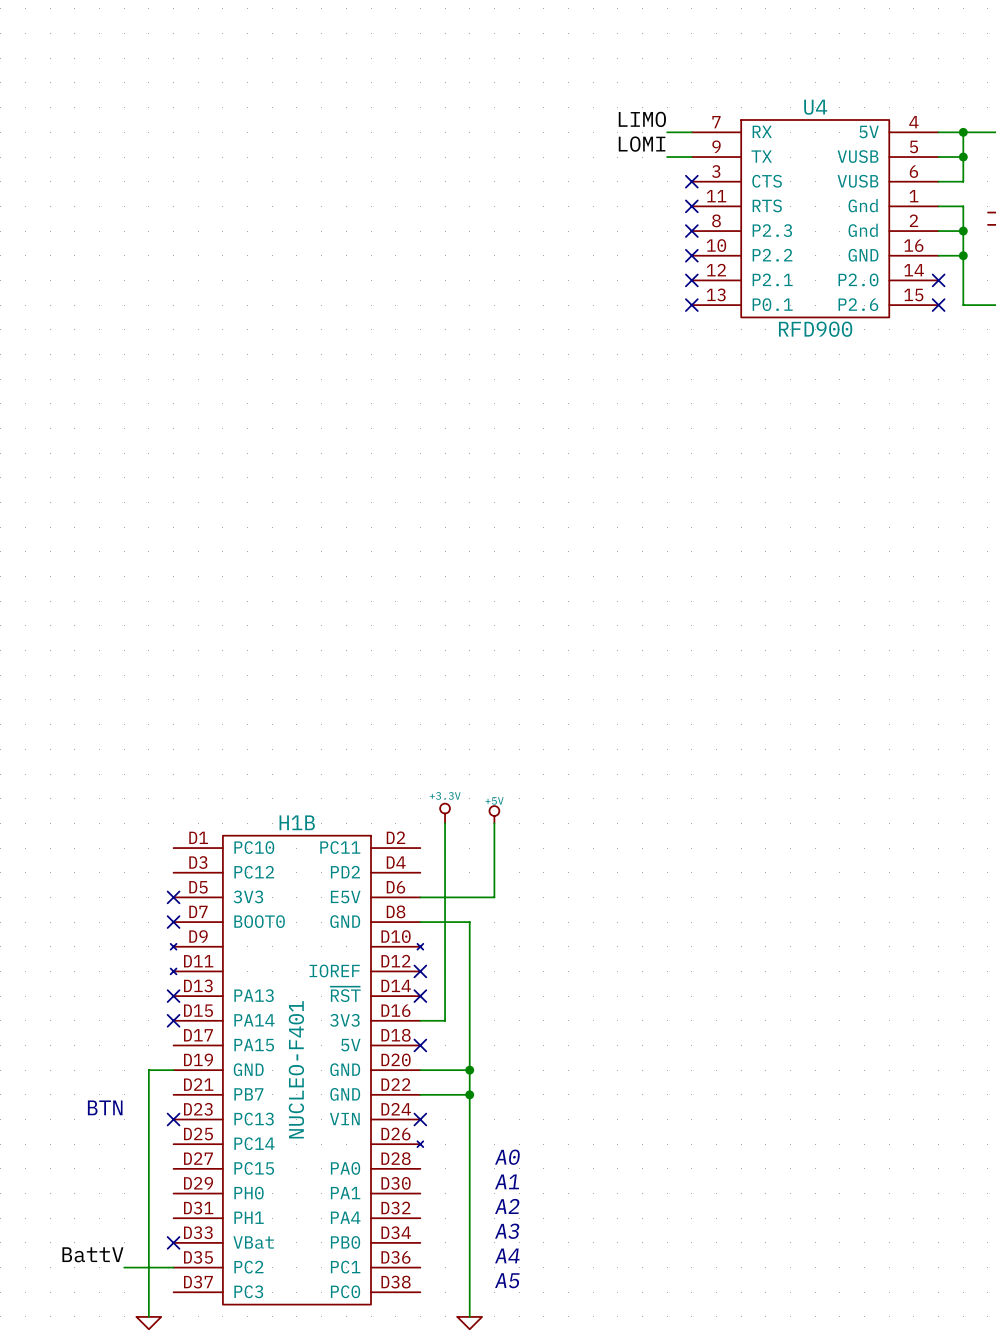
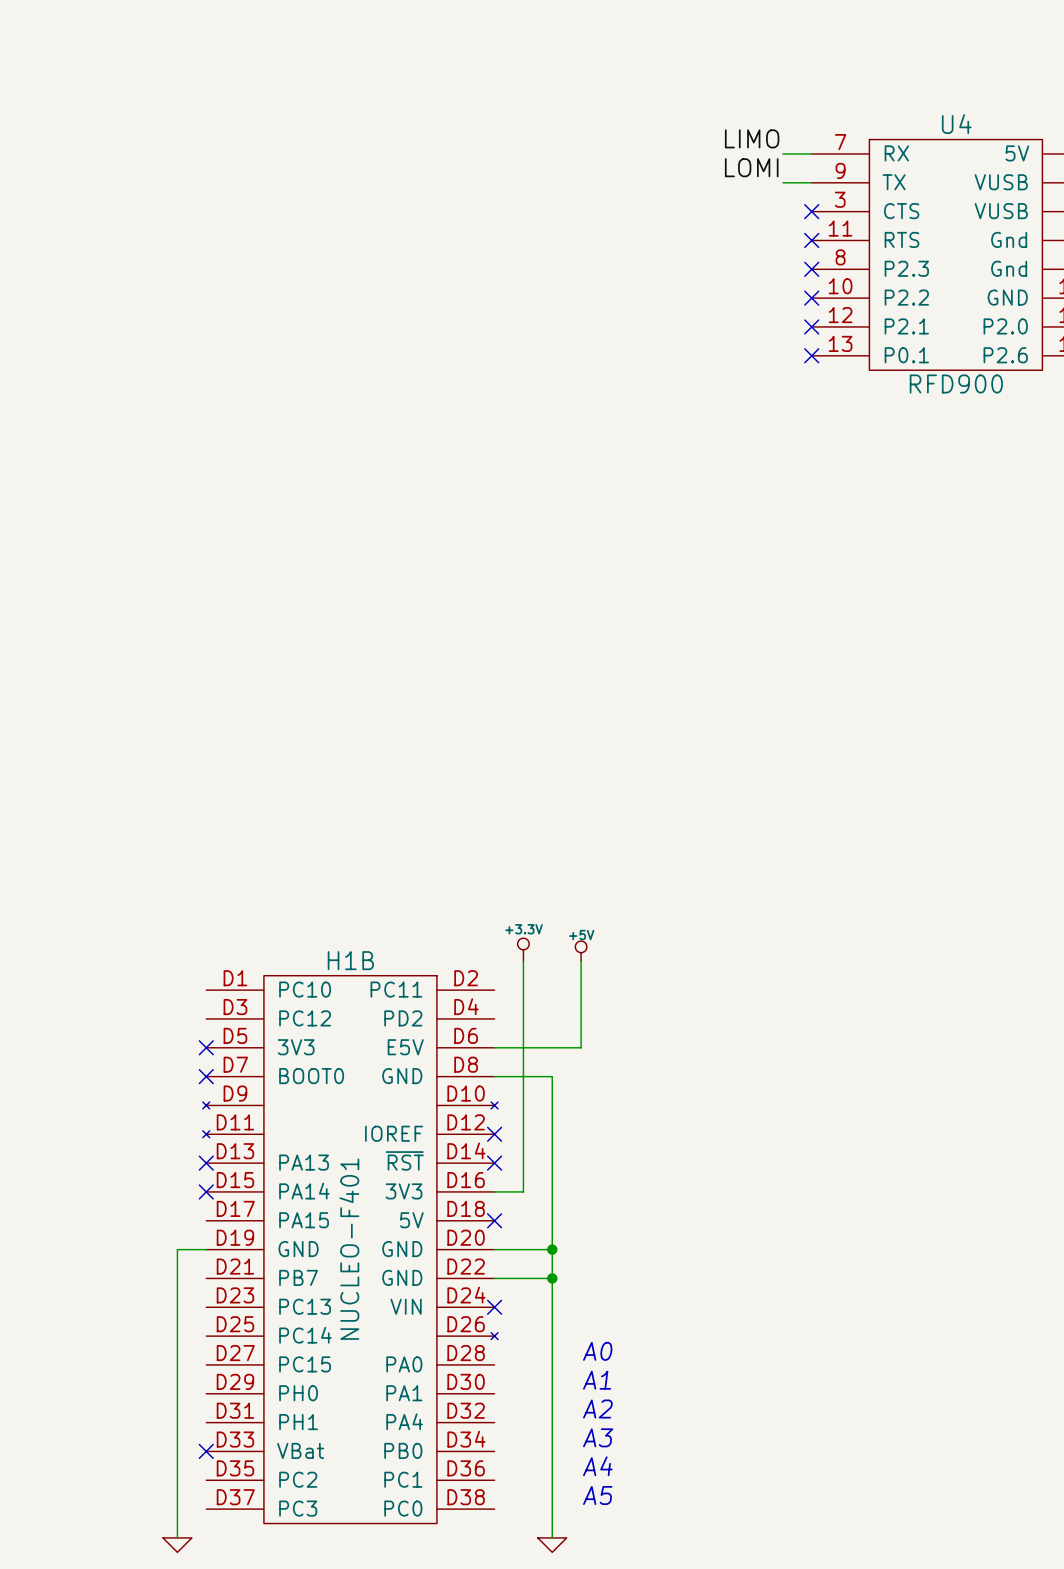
text: BTN (105, 1107) -> none
no-connect mark: (173, 1119) -> none
label: BattV (92, 1254) -> none
wire: (124, 1267) (173, 1267) -> none

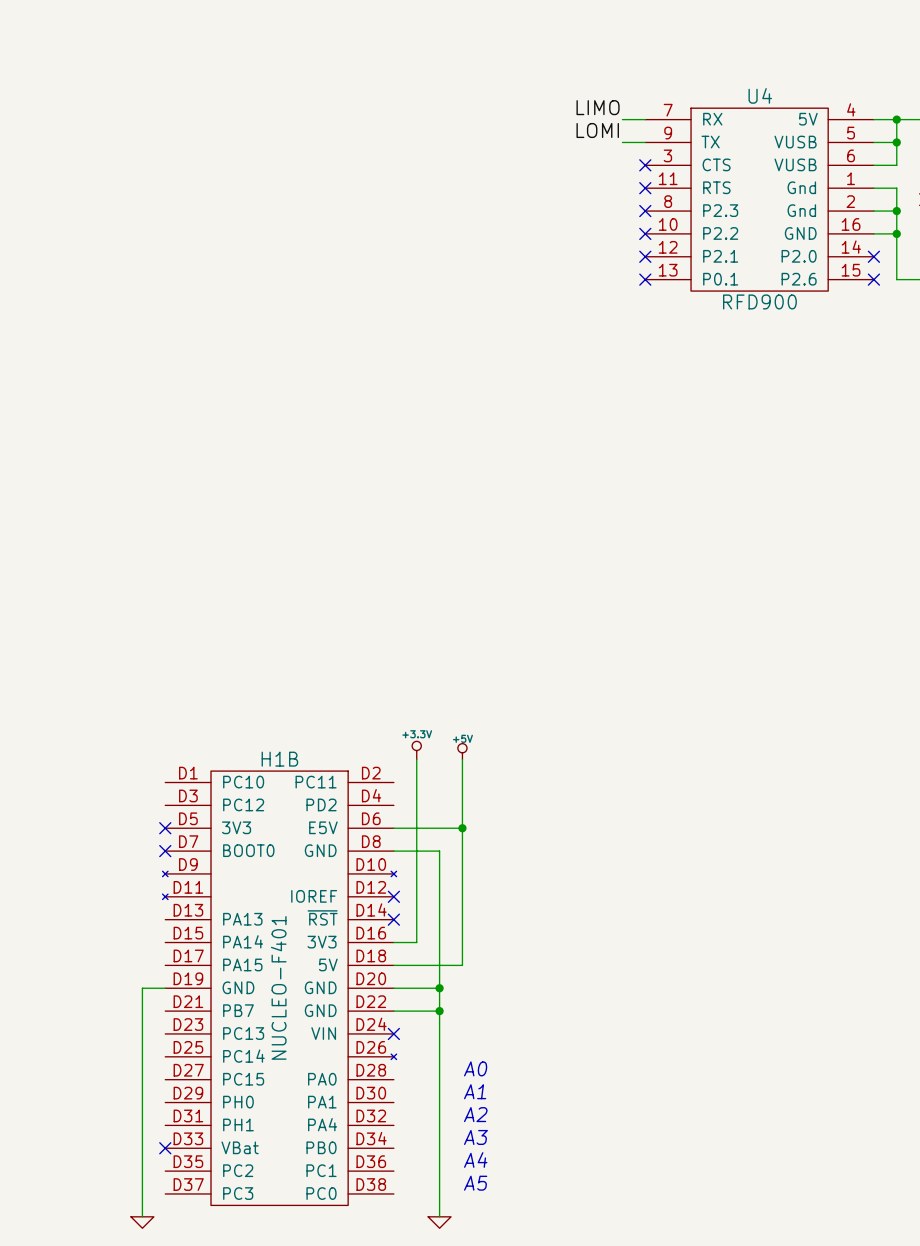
wire: none -> (462, 828) (462, 965) (393, 965)
junction: none -> (462, 828)
no-connect mark: (206, 1163) -> none
no-connect mark: (206, 1191) -> none
no-connect mark: (494, 1220) -> none

